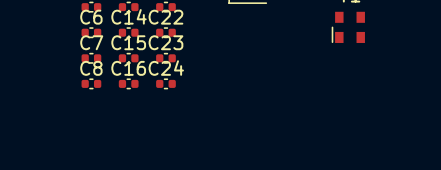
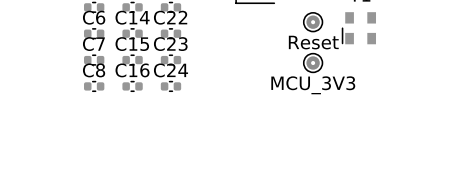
part: none -> Reset (313, 22)
part: none -> MCU_3V3 (313, 63)

